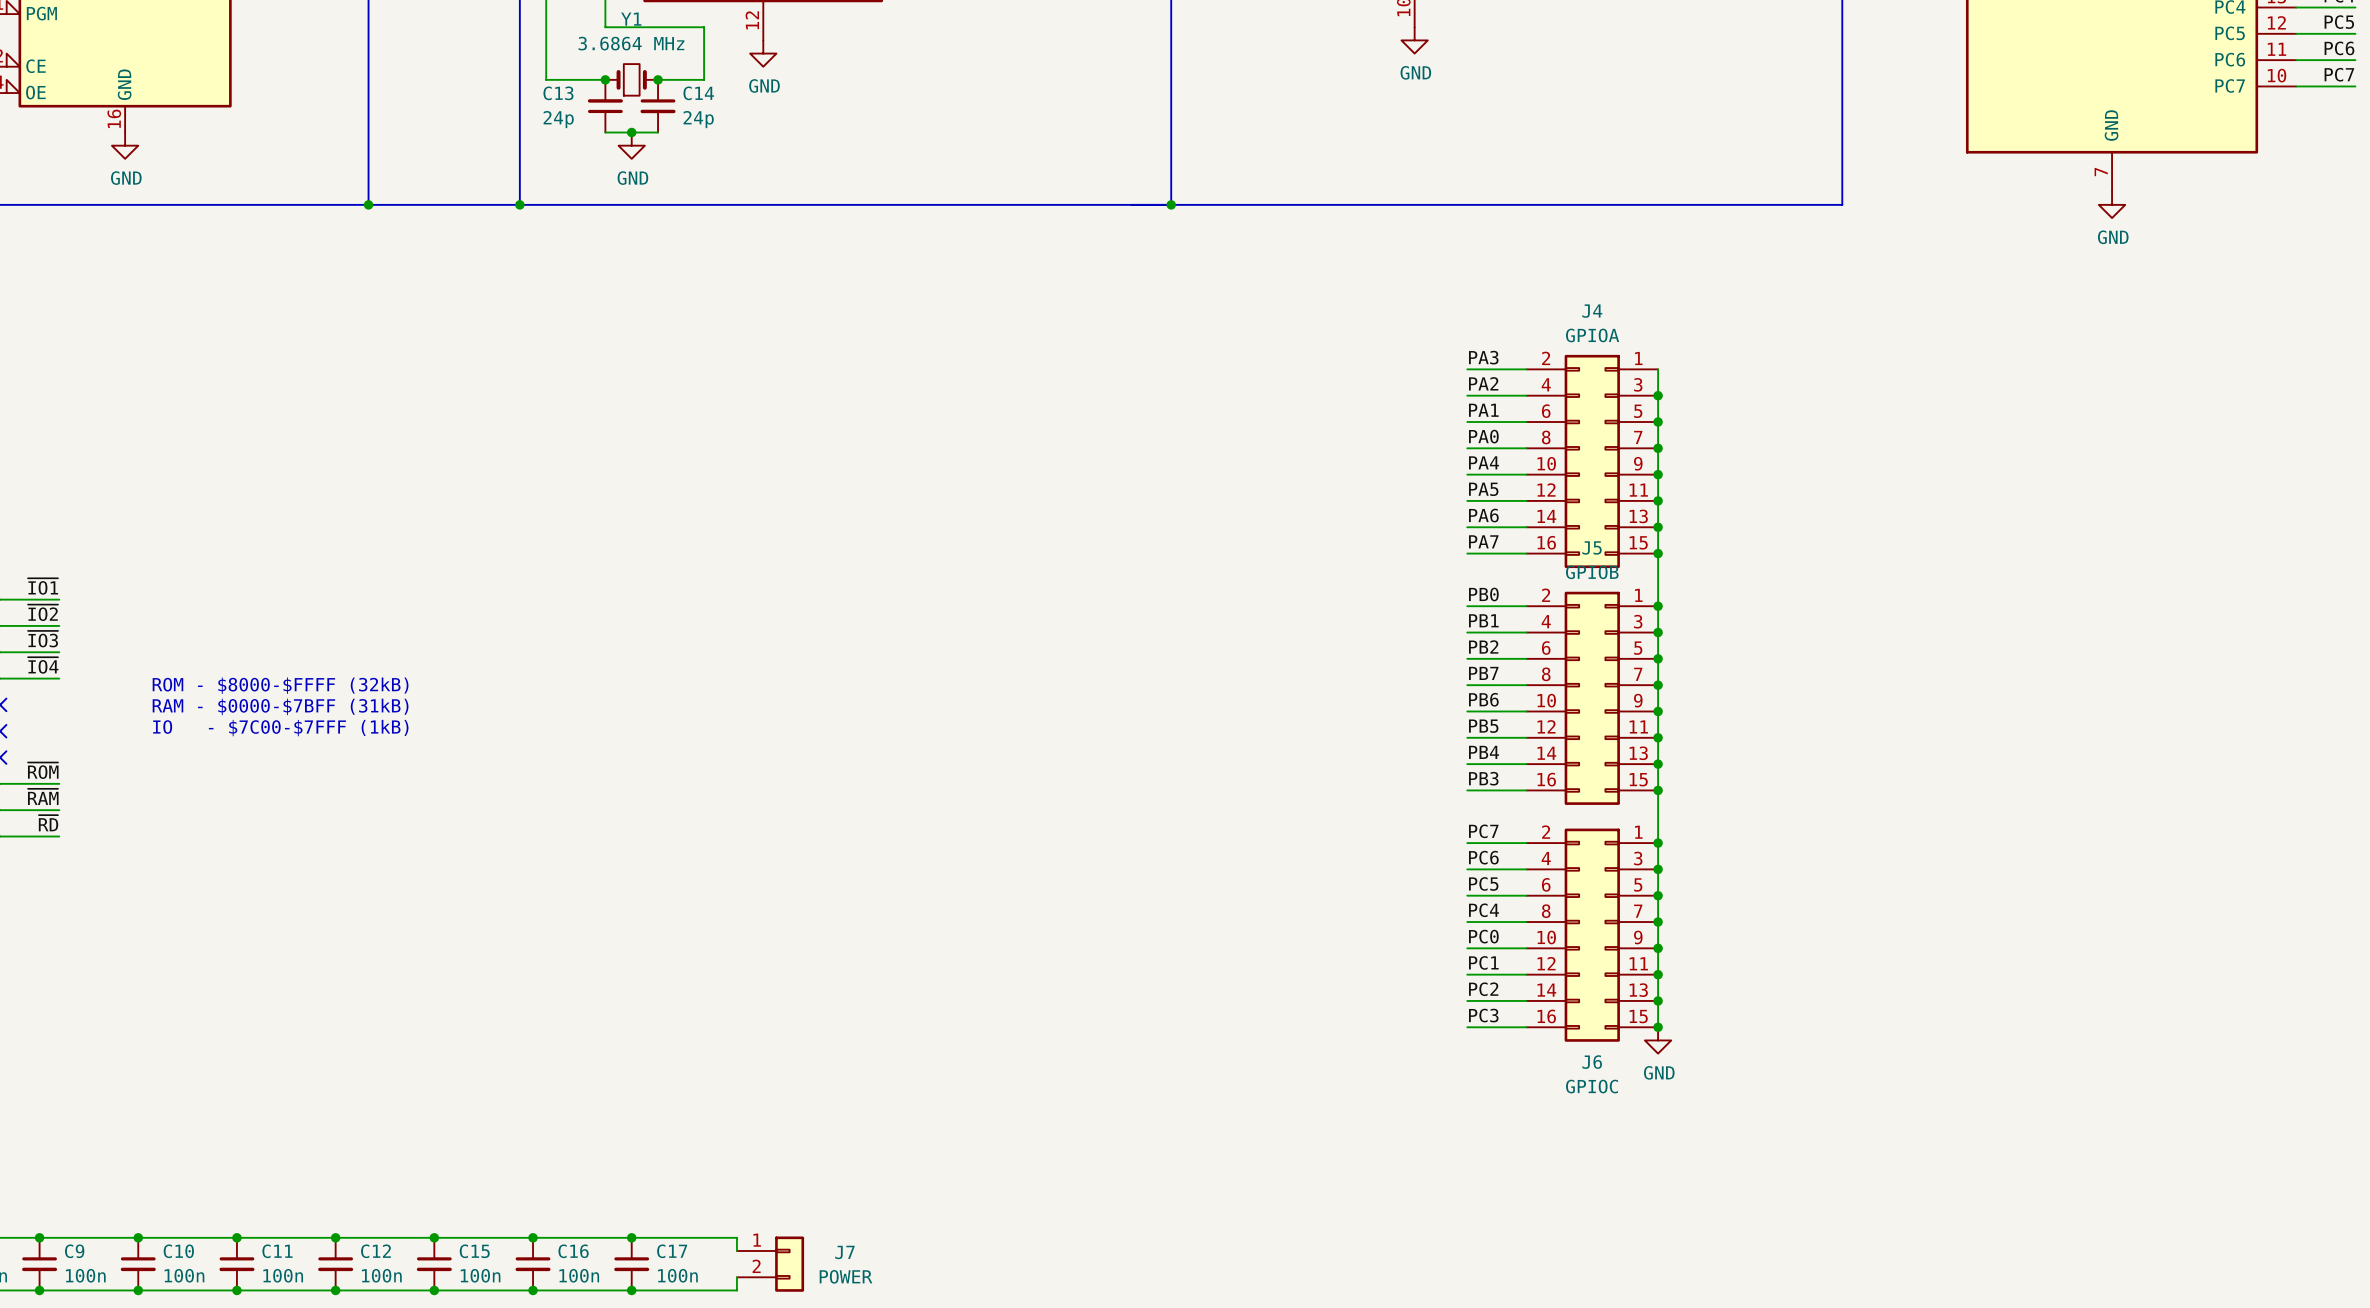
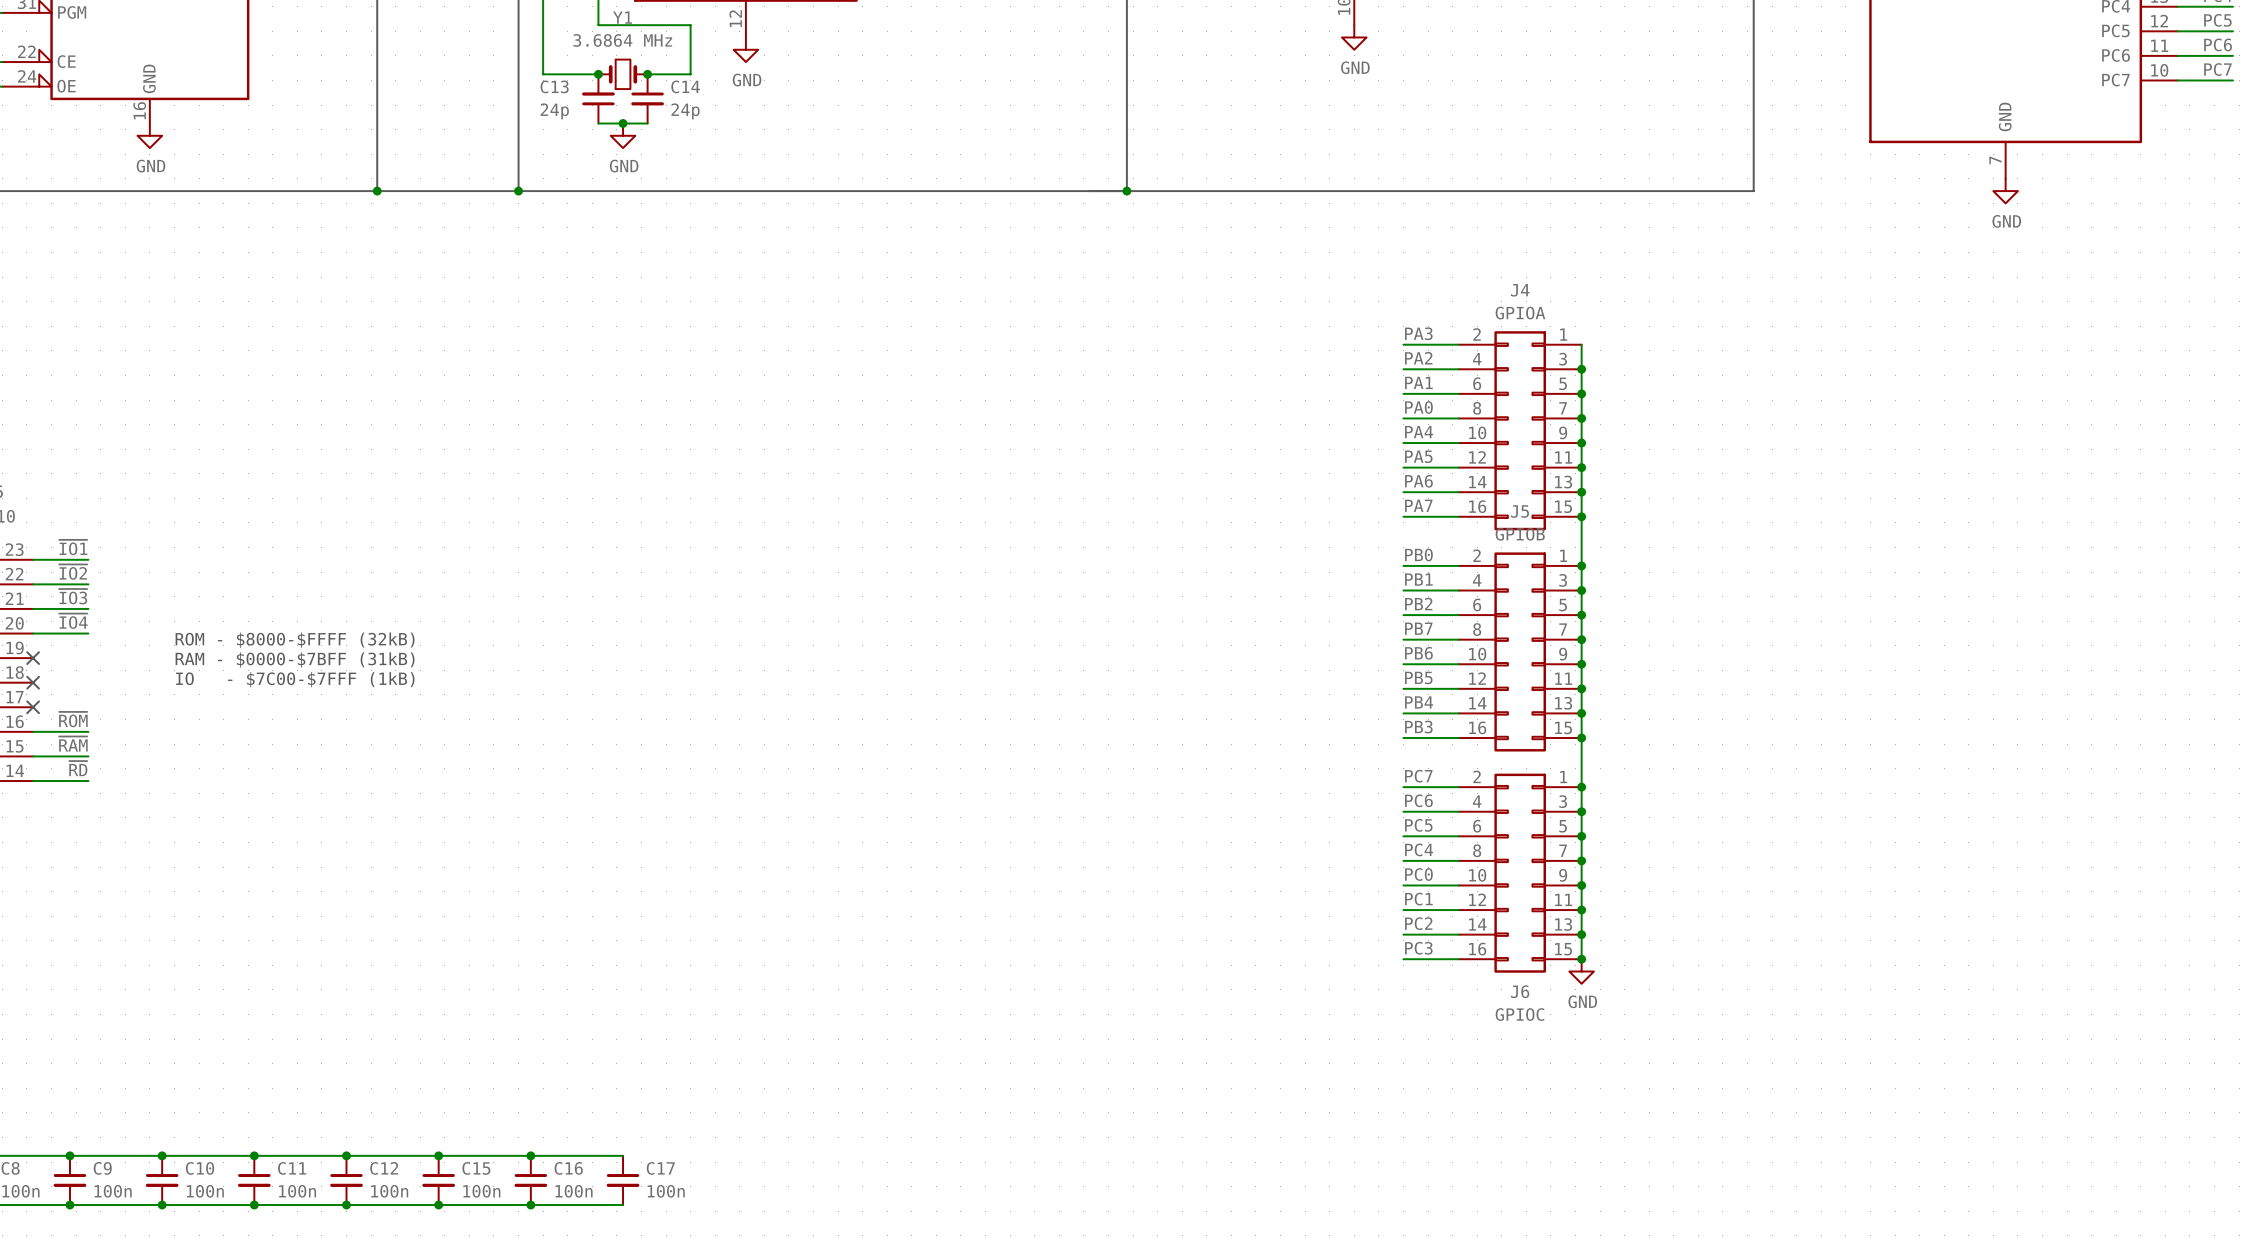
wire: (631, 1237) (736, 1237) (736, 1250) -> none
junction: (631, 1237) -> none
J7: POWER (770, 1264) -> none
wire: (736, 1277) (736, 1290) (631, 1290) -> none
junction: (631, 1290) -> none

